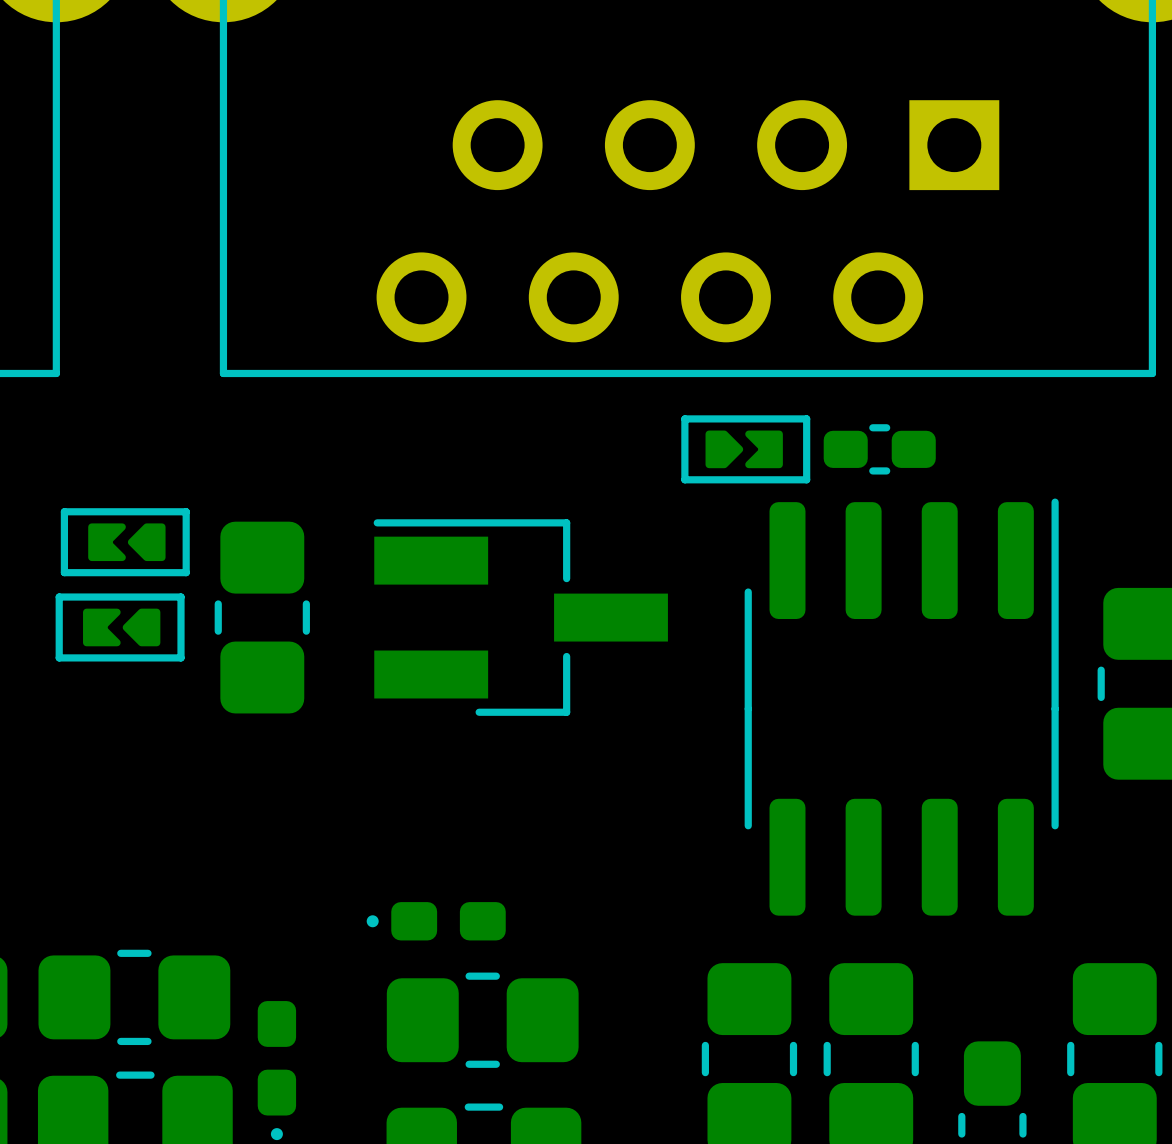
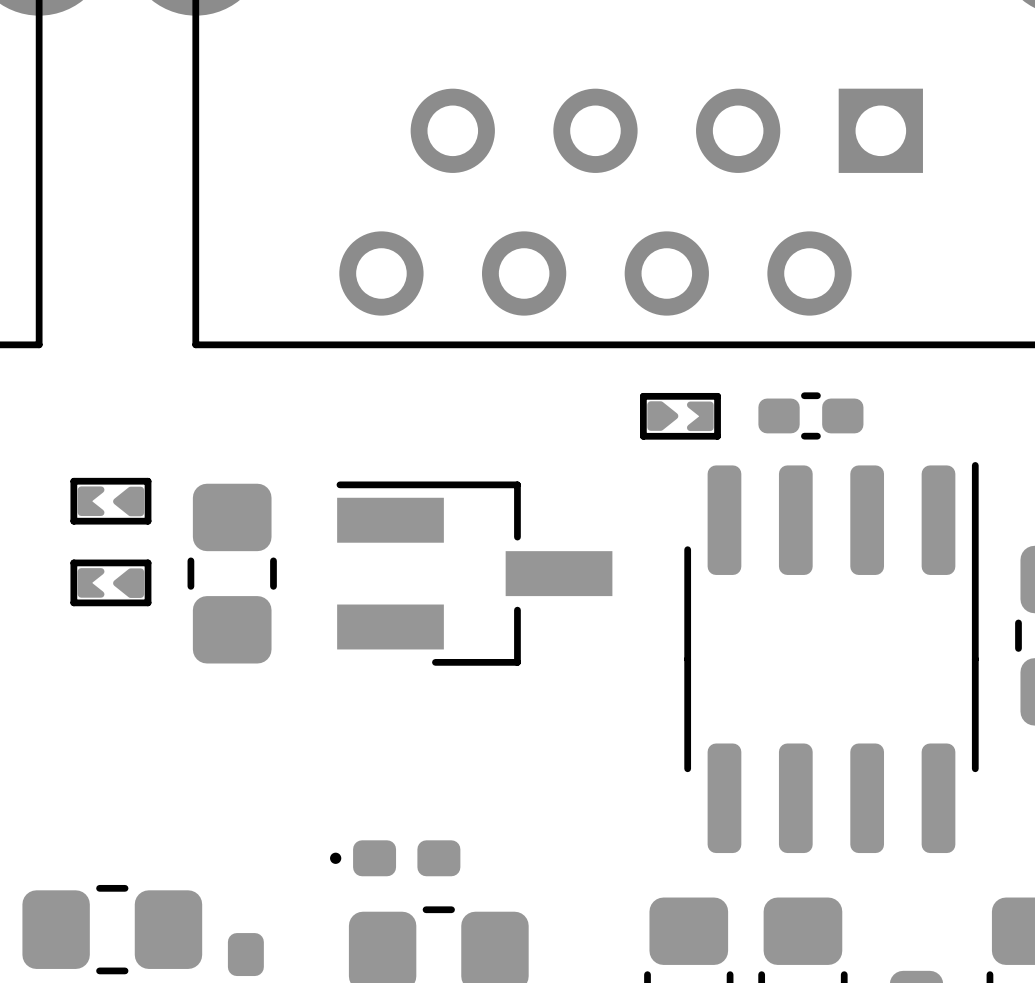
part footprint: [681, 415, 811, 484] -> [639, 392, 721, 440]
part footprint: [60, 508, 190, 577] -> [70, 477, 152, 525]
part footprint: [55, 593, 185, 662] -> [70, 559, 152, 607]

